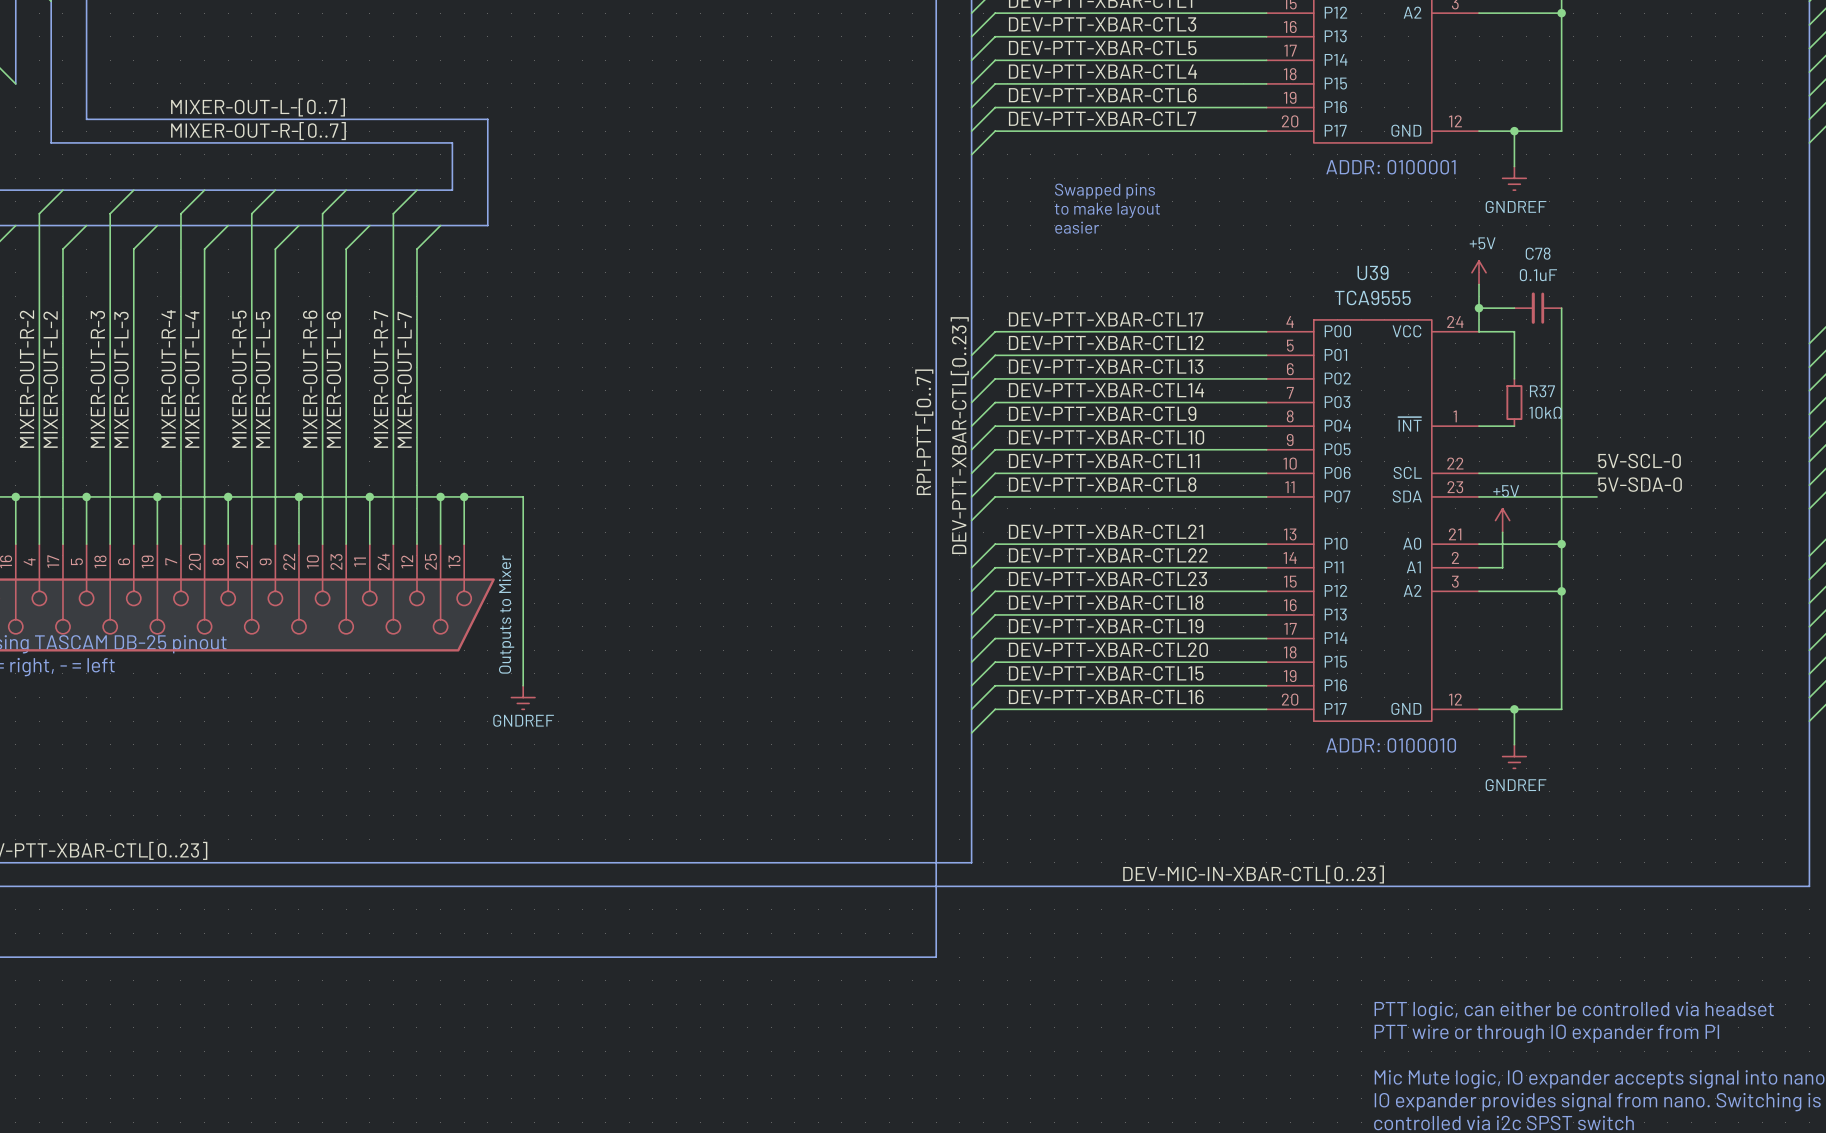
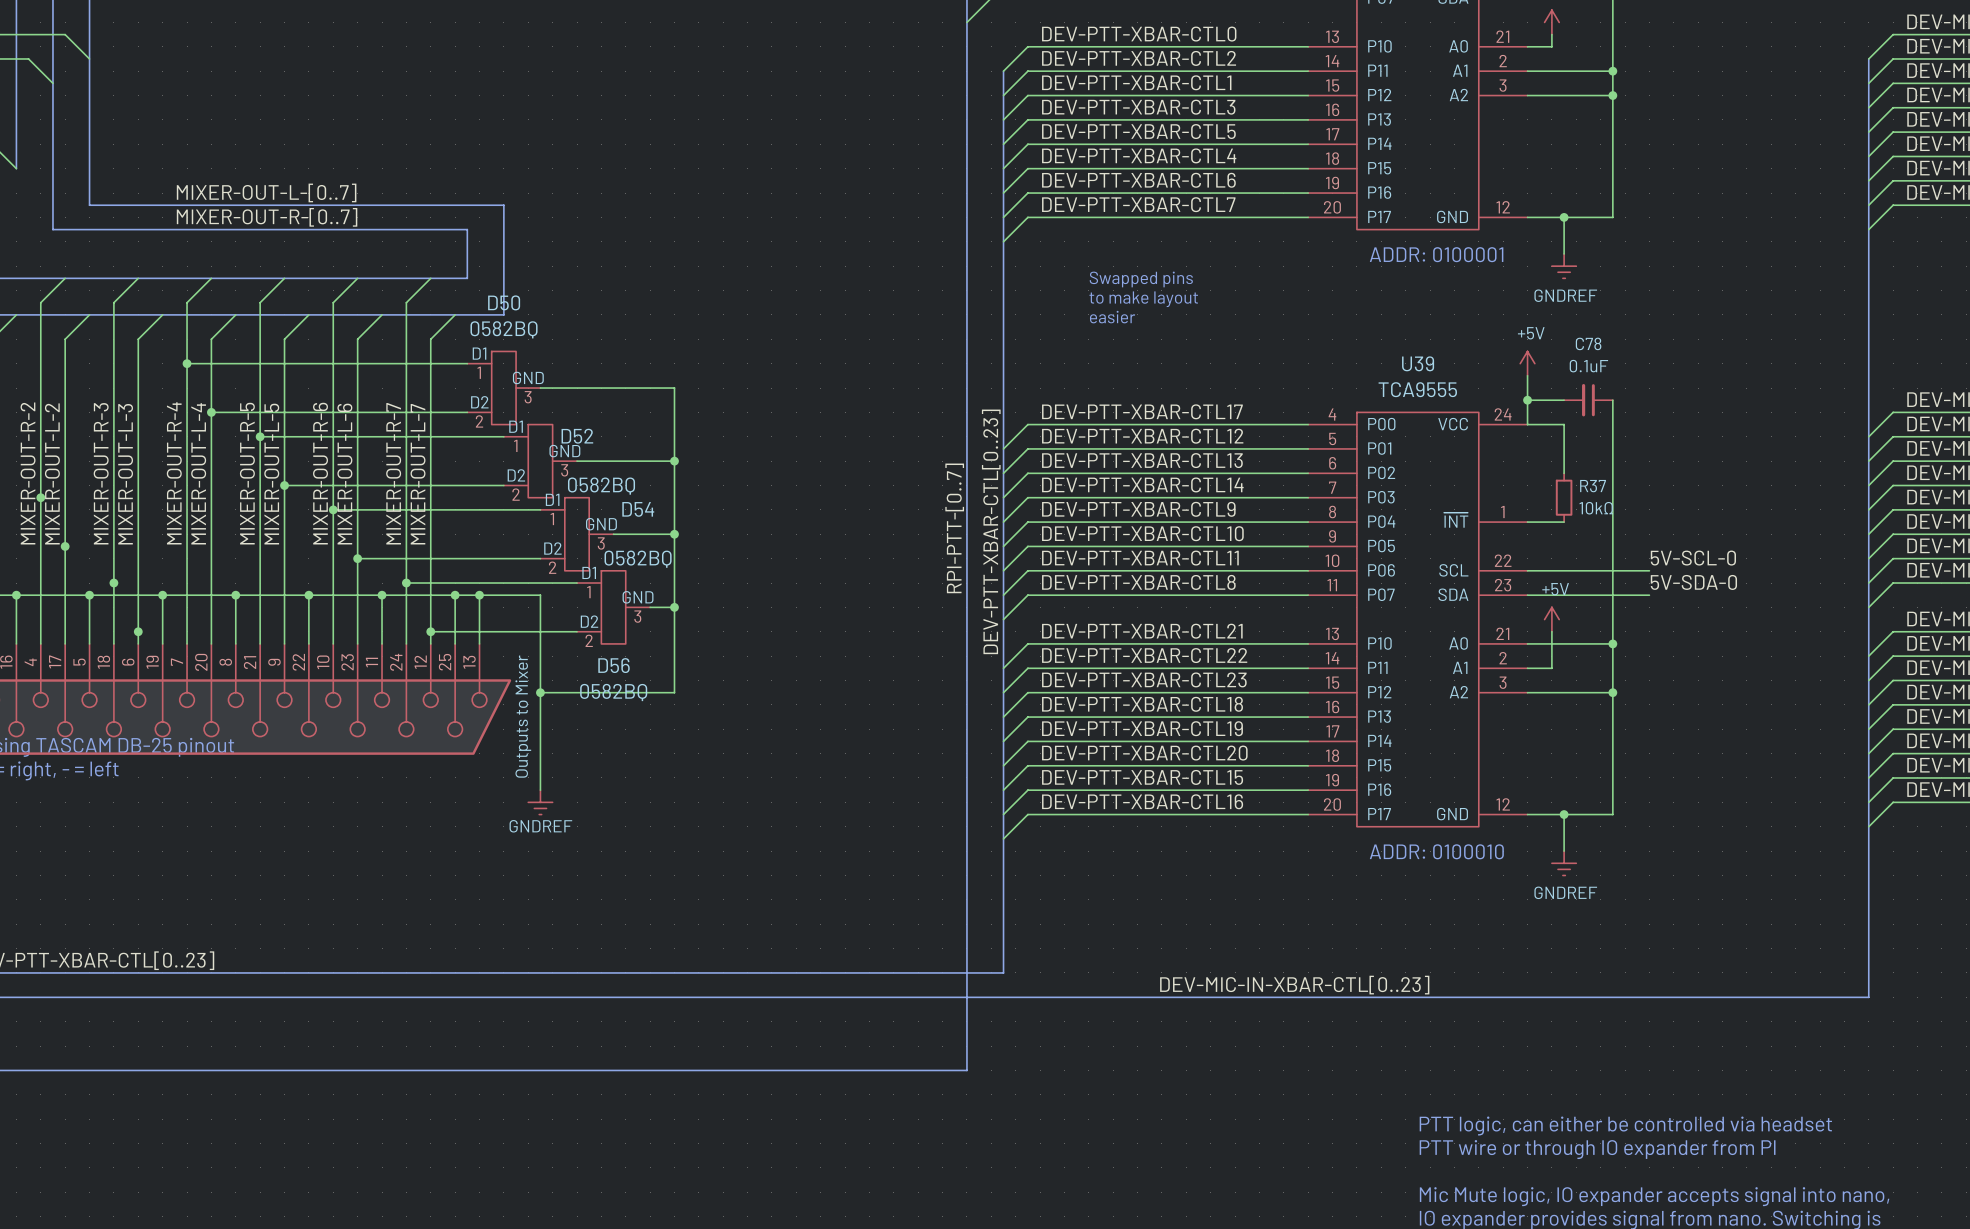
wire: none -> (187, 363) (467, 363)
junction: none -> (187, 363)
D50: none -> 0582BQ (503, 388)
wire: none -> (540, 388) (674, 388) (674, 692) (540, 692)
wire: none -> (211, 412) (467, 412)
junction: none -> (211, 412)
wire: none -> (260, 436) (503, 436)
junction: none -> (260, 436)
D52: none -> 0582BQ (540, 461)
wire: none -> (577, 461) (674, 461)
junction: none -> (674, 461)
wire: none -> (284, 485) (503, 485)
junction: none -> (284, 485)
junction: none -> (40, 497)
wire: none -> (333, 509) (540, 509)
junction: none -> (333, 509)
D54: none -> 0582BQ (577, 534)
wire: none -> (613, 534) (674, 534)
junction: none -> (674, 534)
junction: none -> (65, 546)
wire: none -> (357, 558) (540, 558)
junction: none -> (357, 558)
junction: none -> (113, 583)
wire: none -> (406, 583) (577, 583)
junction: none -> (406, 583)
D56: none -> 0582BQ (613, 607)
wire: none -> (650, 607) (674, 607)
junction: none -> (674, 607)
junction: none -> (138, 631)
wire: none -> (430, 631) (577, 631)
junction: none -> (430, 631)
junction: none -> (540, 692)

